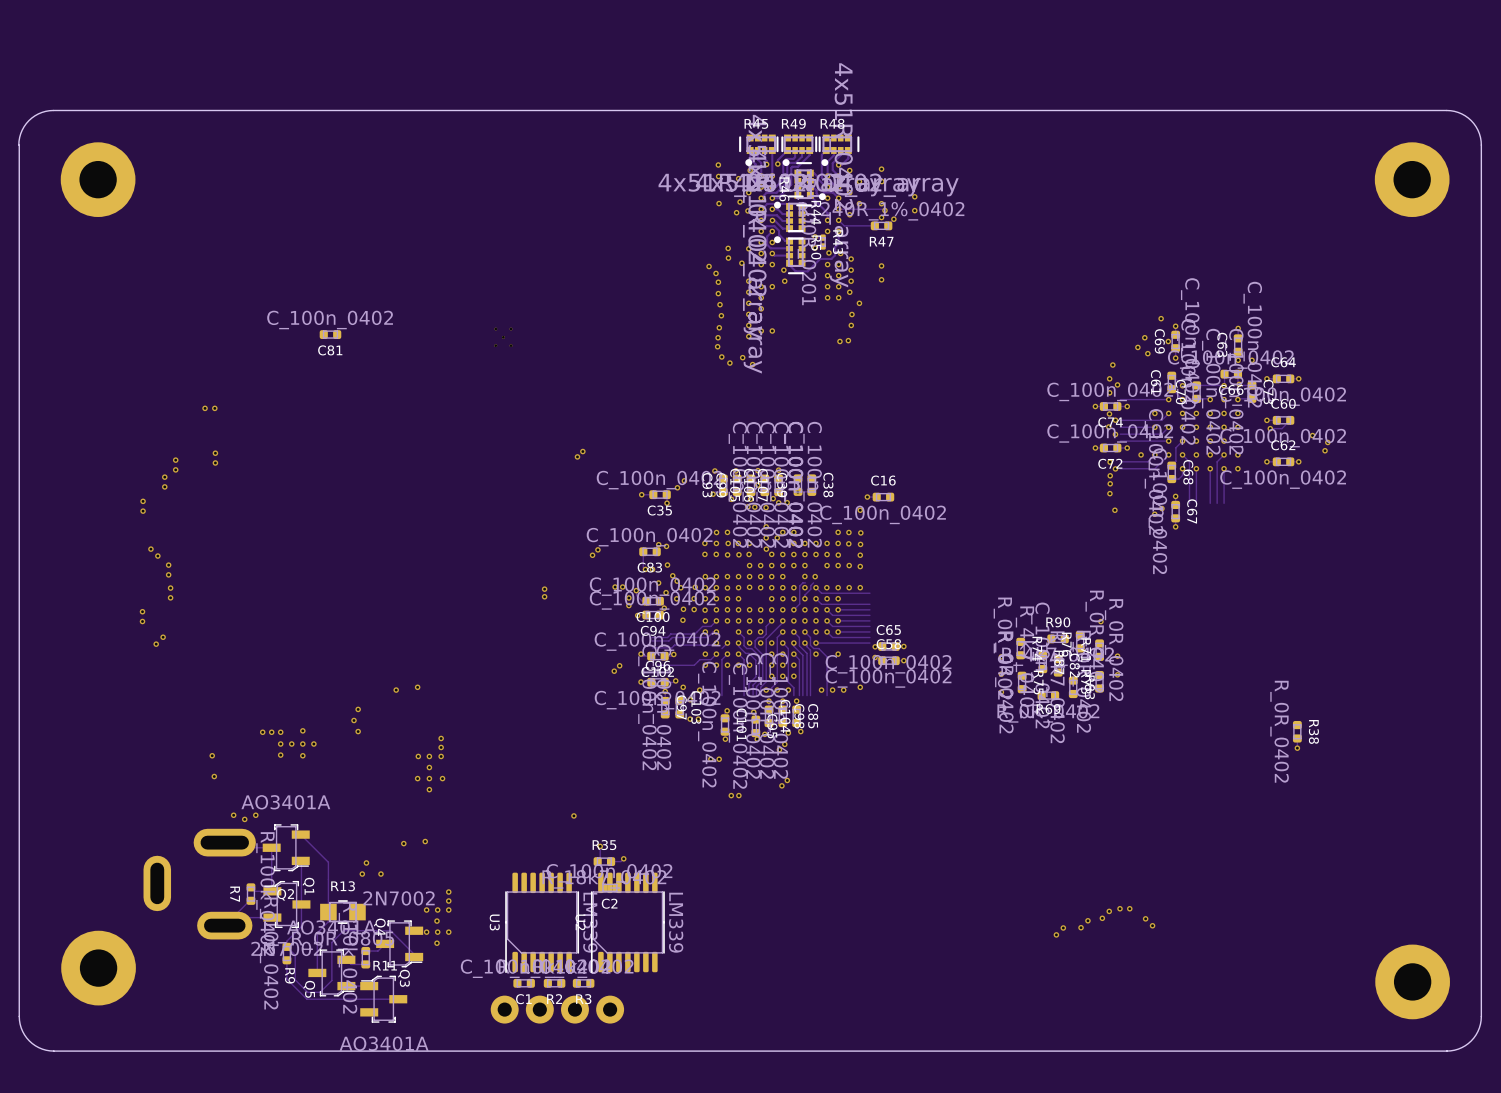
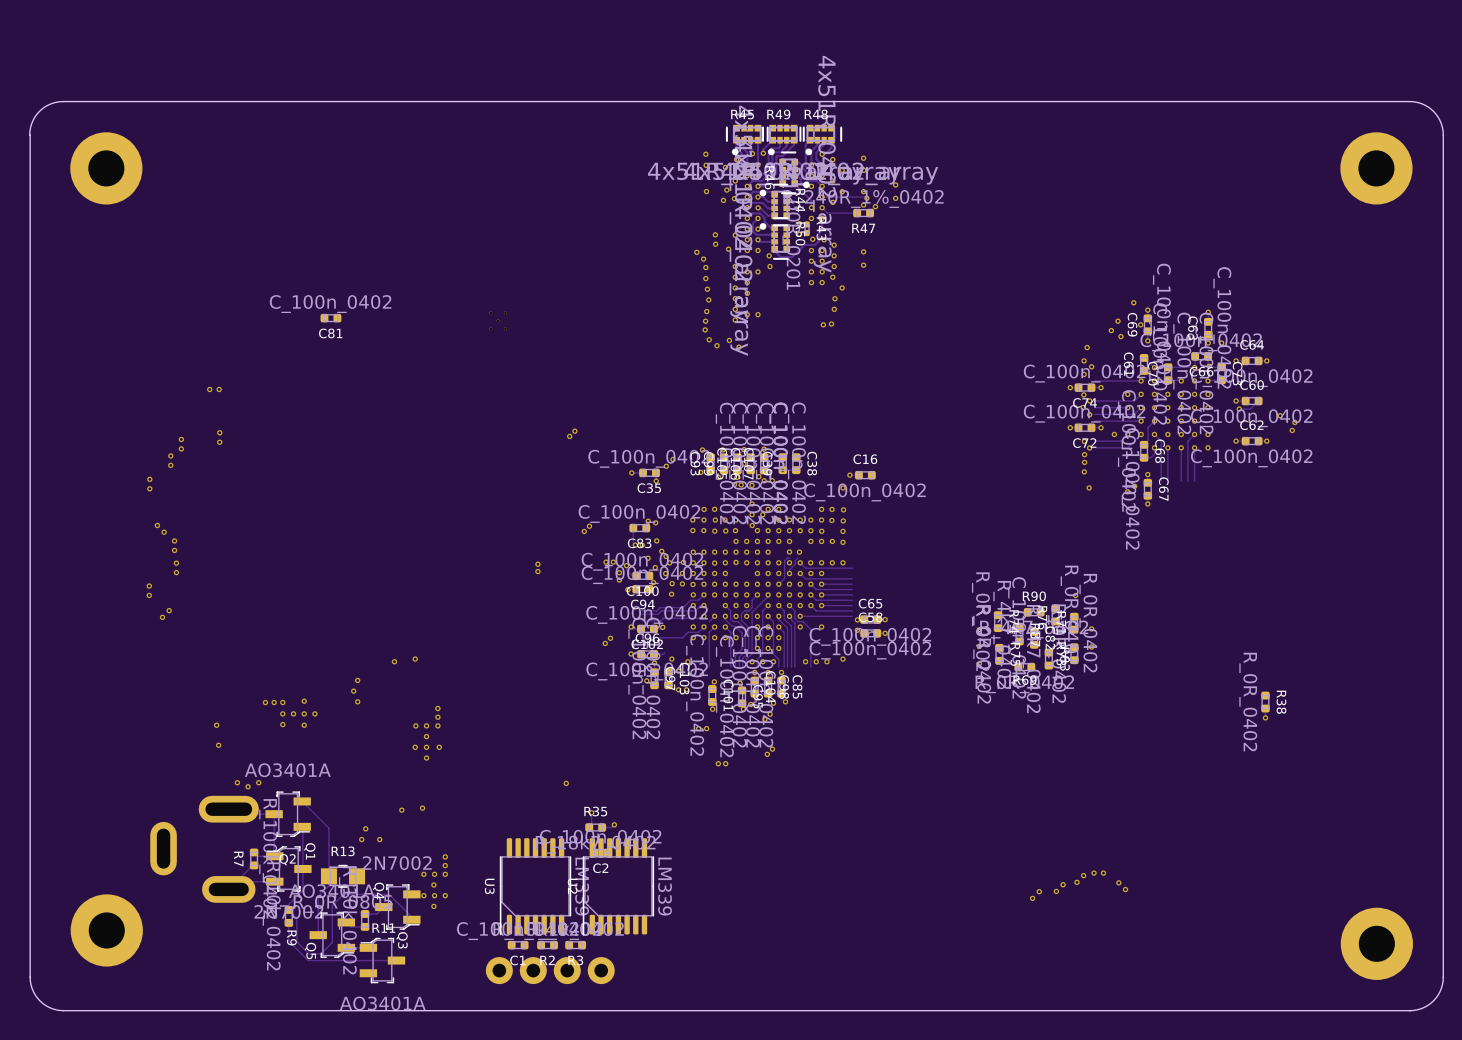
via position: (675, 680) -> (646, 680)

